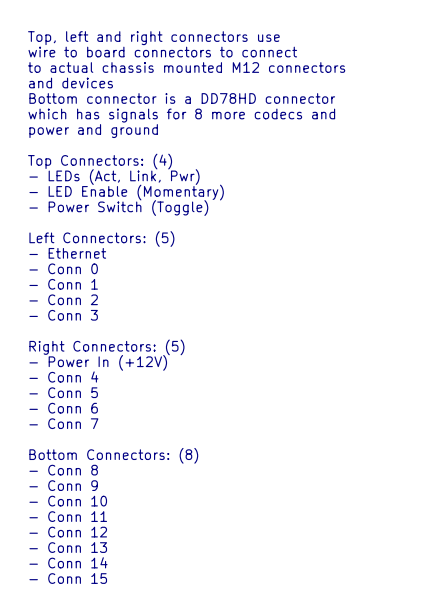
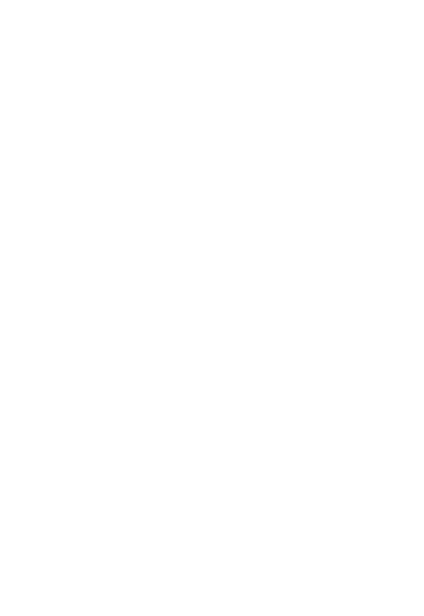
text: Top, left and right connectors use (153, 38) -> none
text: wire to board connectors to connect (162, 52) -> none
text: to actual chassis mounted M12 connectors (186, 67) -> none
text: and devices (70, 82) -> none
text: Bottom connector is a DD78HD connector (182, 98) -> none
text: which has signals for 8 more codecs and (181, 115) -> none
text: power and ground (93, 131) -> none
text: Top Connectors: (4) (100, 161) -> none
text: - LEDs (Act, Link, Pwr) (114, 177) -> none
text: - LED Enable (Momentary) (126, 192) -> none
text: - Power Switch (Toggle) (118, 208) -> none
text: Left Connectors: (5) (101, 239) -> none
text: - Ethernet (67, 253) -> none
text: - Conn 0 (63, 268) -> none
text: - Conn 1 (63, 284) -> none
text: - Conn 2 (63, 299) -> none
text: - Conn 3 (63, 315) -> none
text: Right Connectors: (5) (106, 347) -> none
text: - Power In (+12V) (98, 362) -> none
text: - Conn 4 (63, 376) -> none
text: - Conn 5 (63, 392) -> none
text: - Conn 6 (63, 408) -> none
text: - Conn 7 (63, 423) -> none
text: Bottom Connectors: (8) (113, 455) -> none
text: - Conn 8 (63, 470) -> none
text: - Conn 9 (63, 485) -> none
text: - Conn 10 (68, 501) -> none
text: - Conn 11 (68, 516) -> none
text: - Conn 12 (68, 532) -> none
text: - Conn 13 (68, 547) -> none
text: - Conn 14 (68, 562) -> none
text: - Conn 15 (68, 578) -> none

